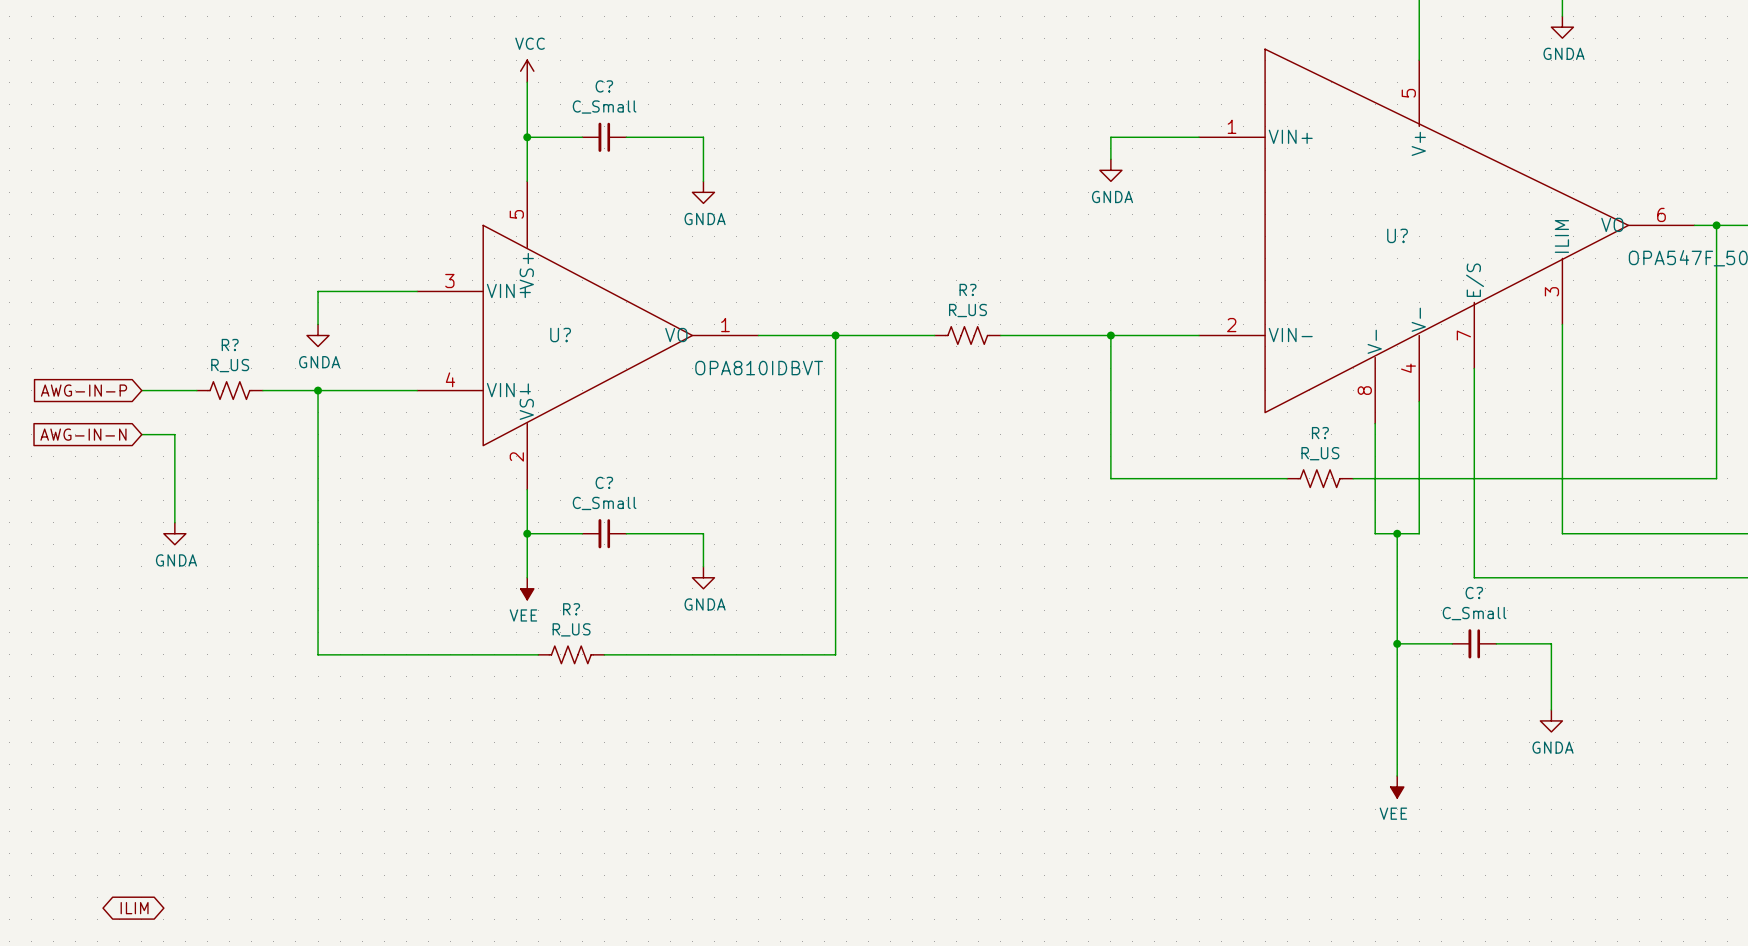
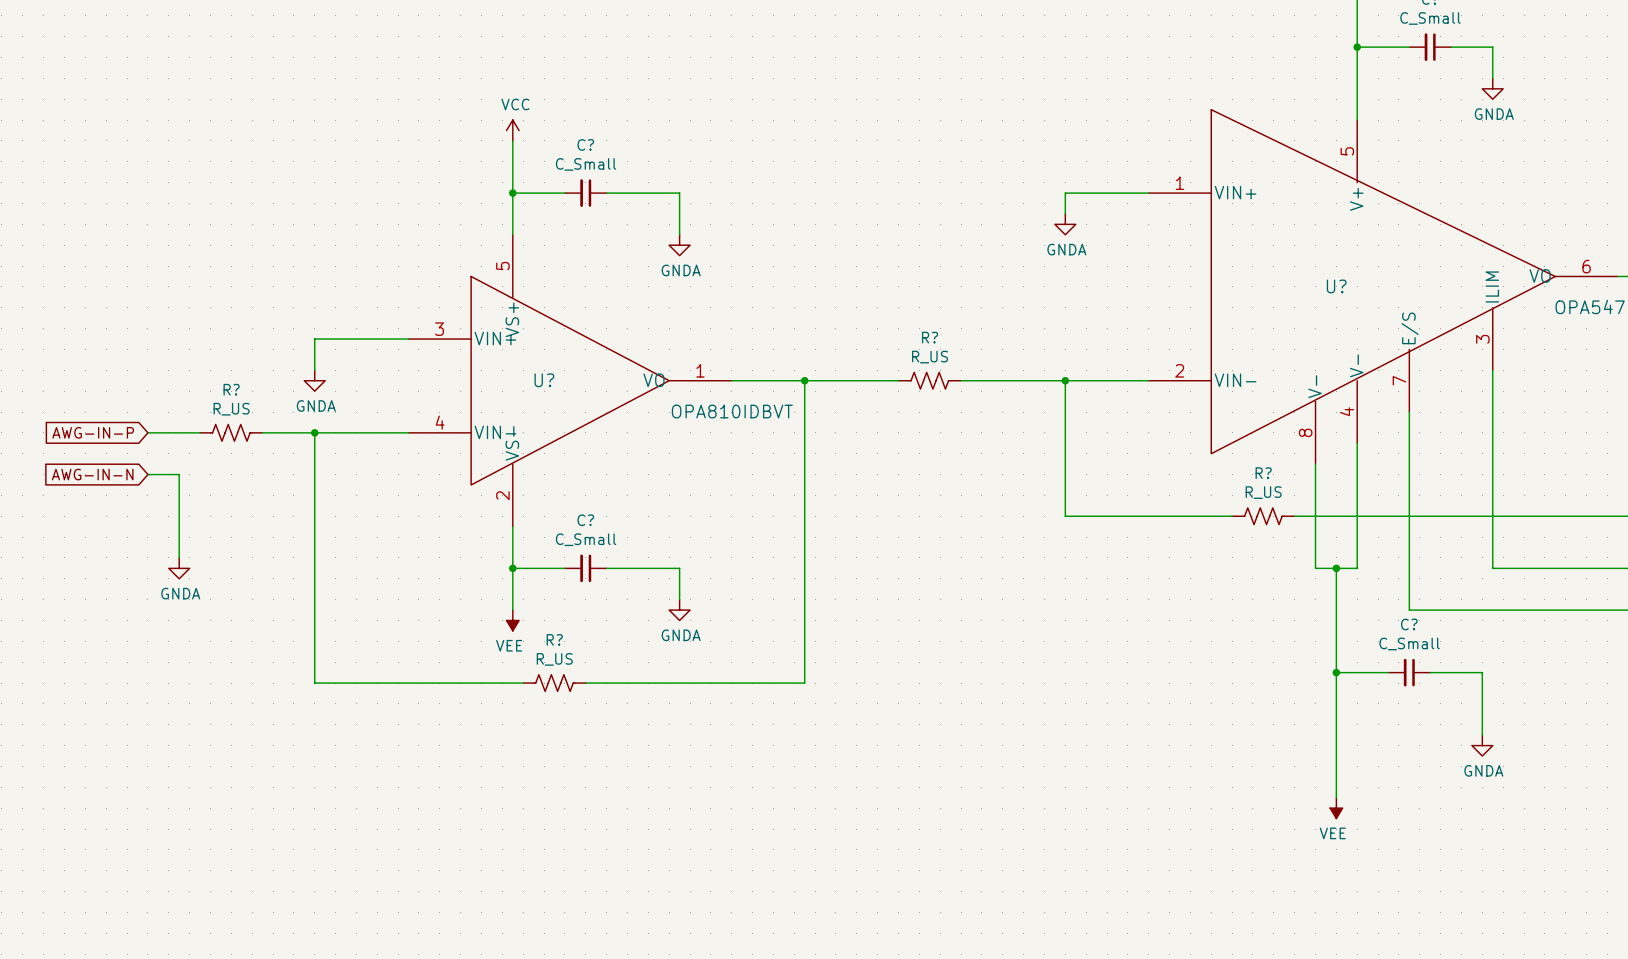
global label: ILIM (134, 908) -> none

